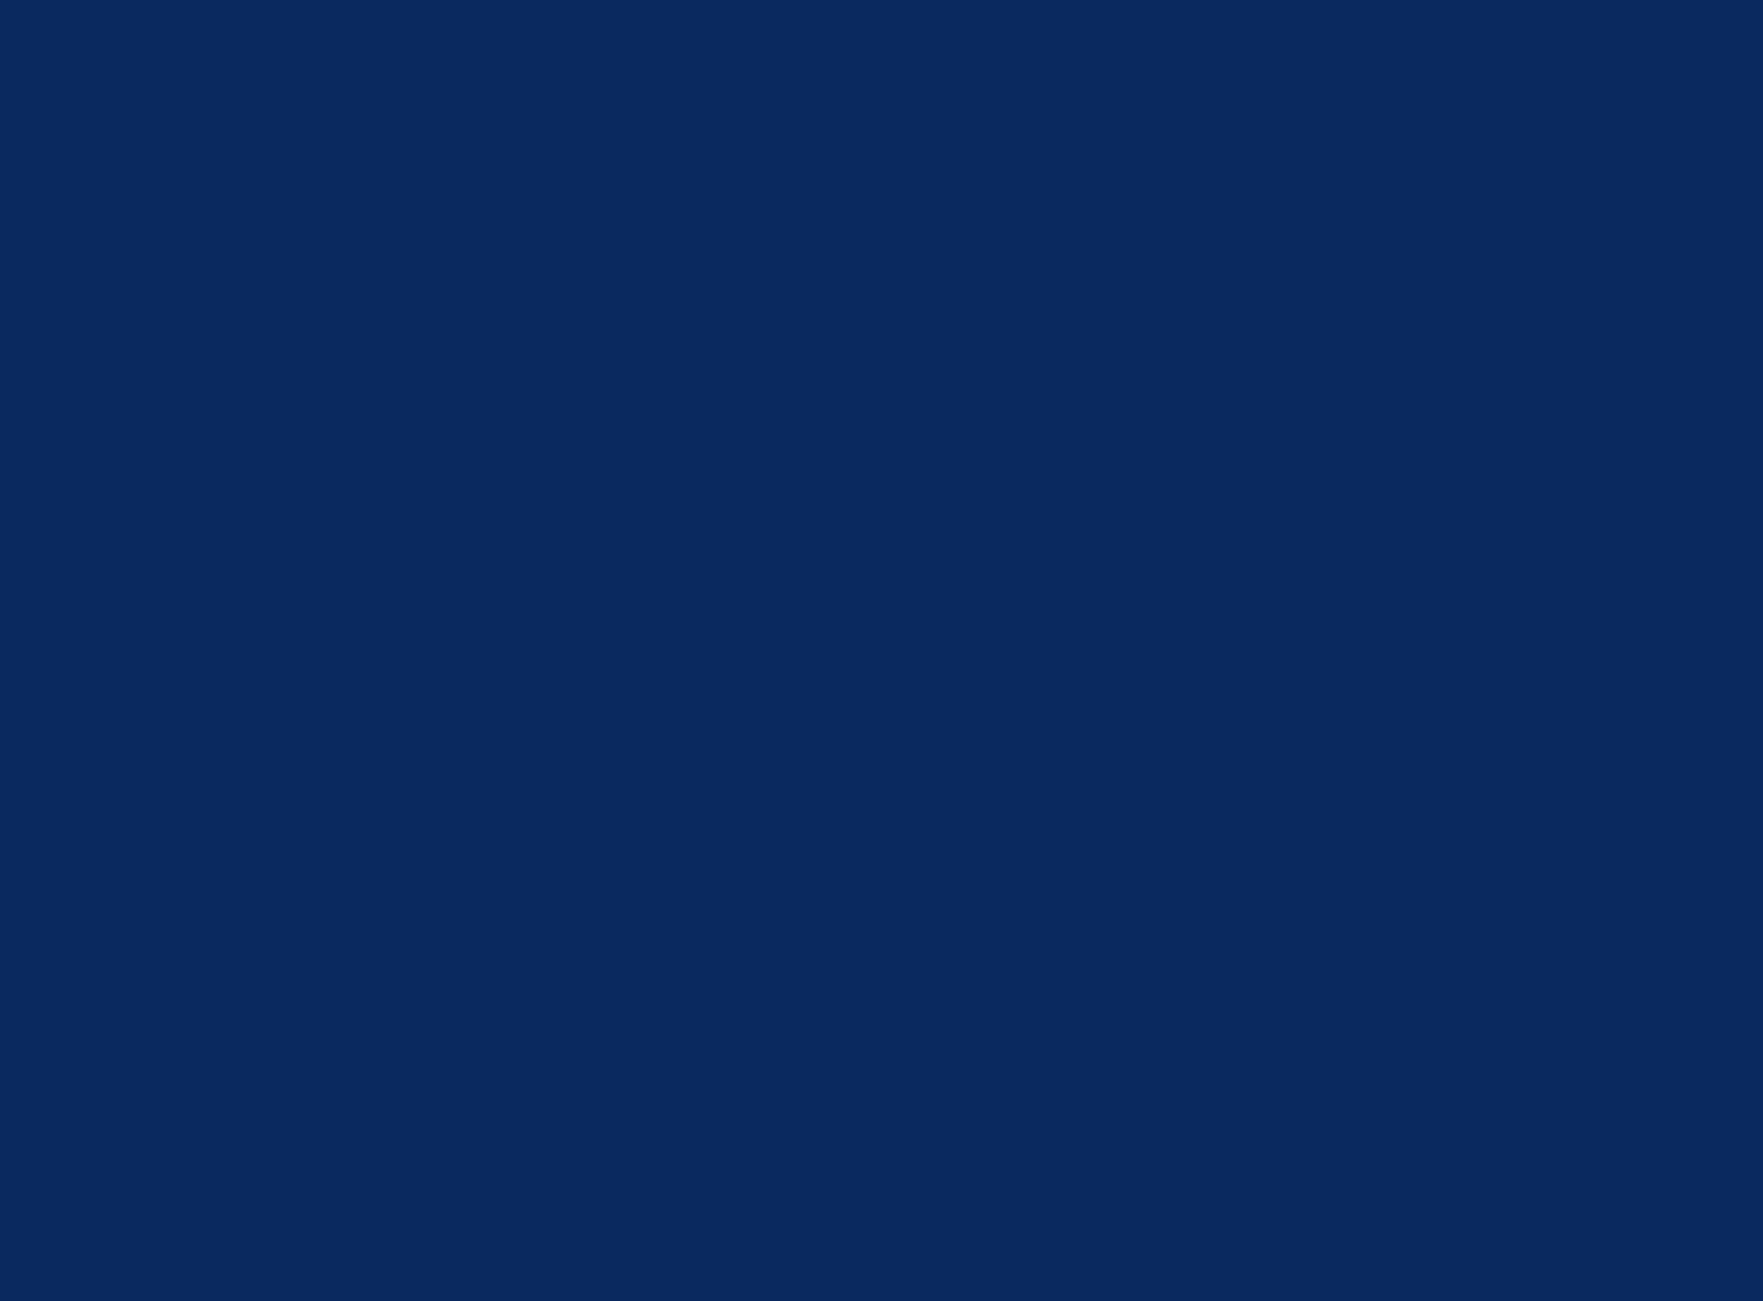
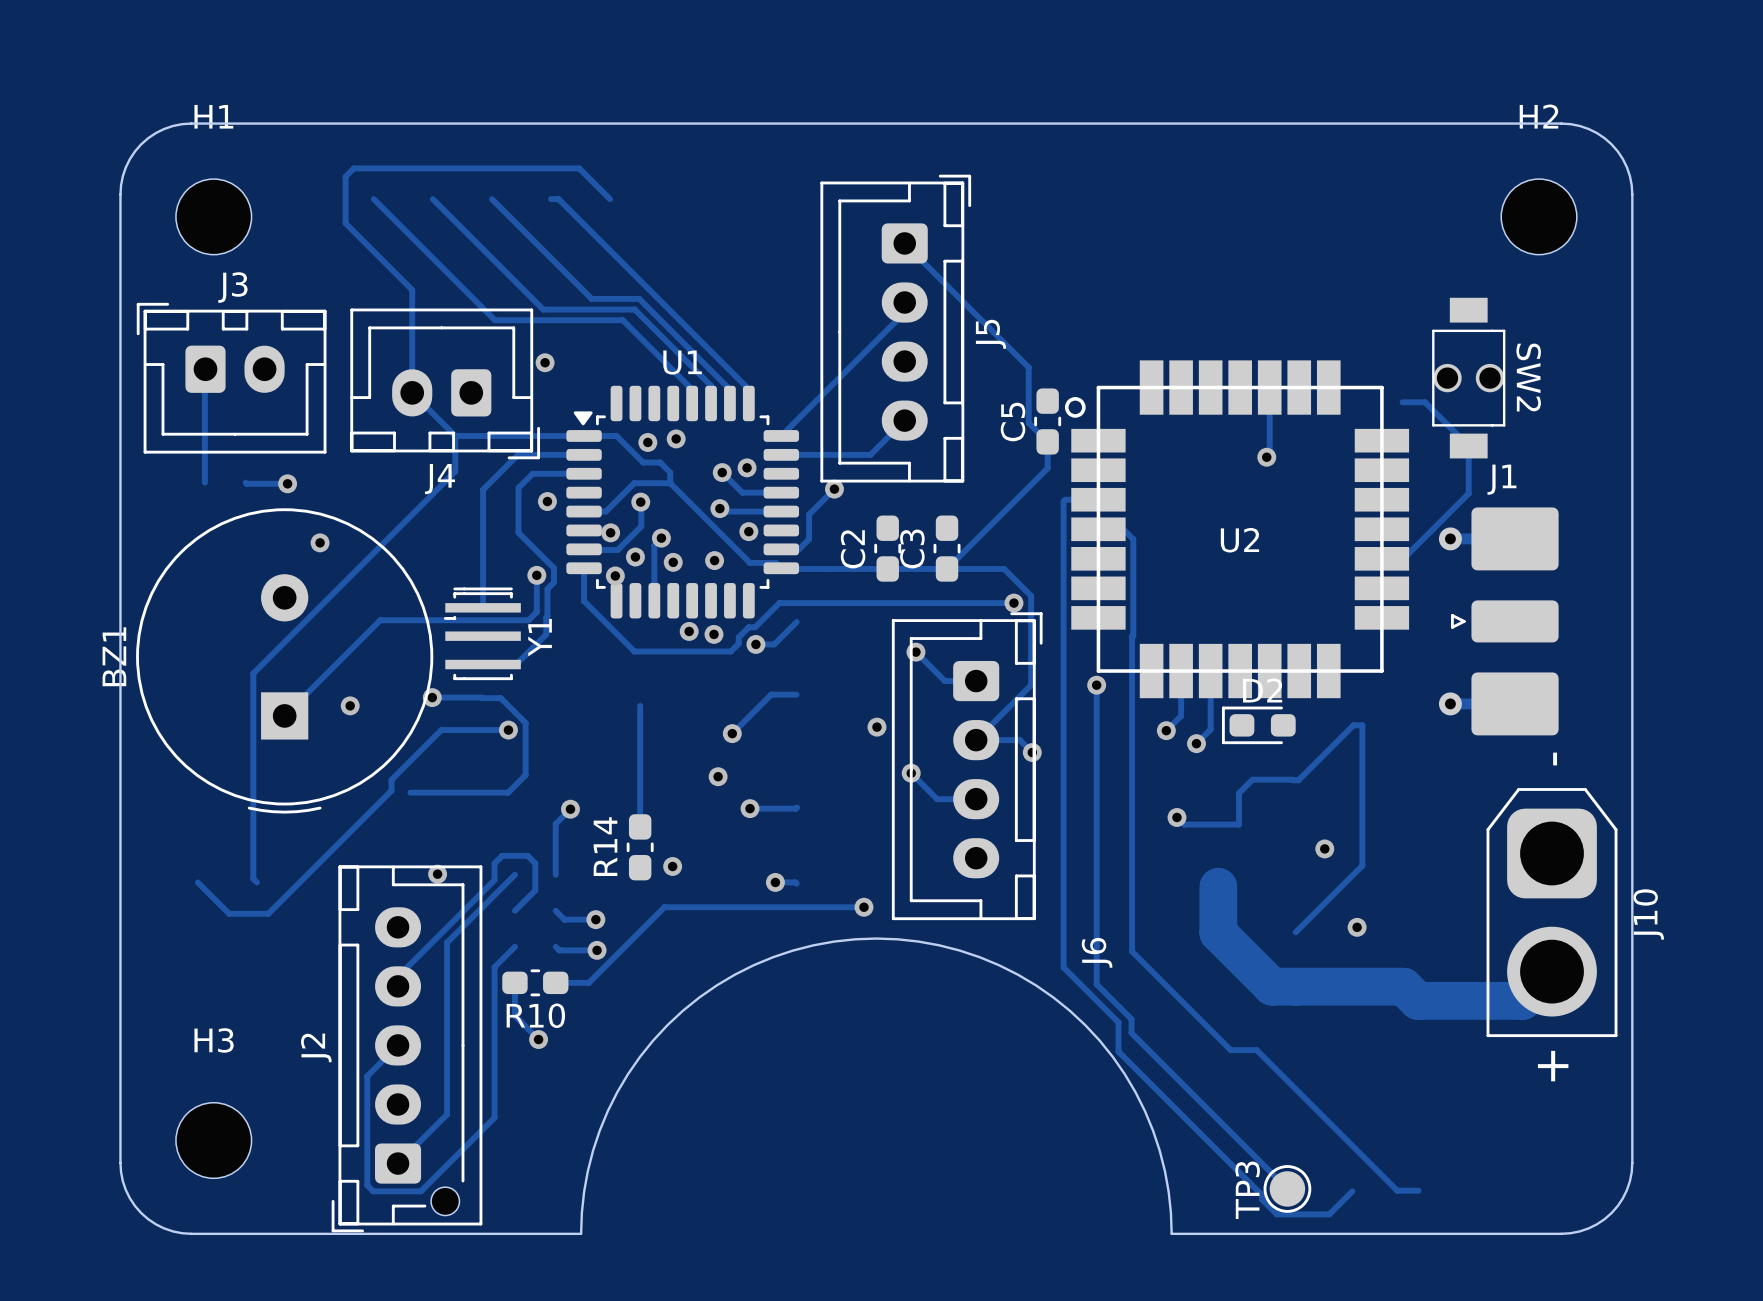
board edge: none -> (191, 123) (1561, 123) (1579, 125) (1604, 138) (1622, 158) (1629, 176) (1632, 194) (1632, 1162) (1626, 1190) (1617, 1206) (1604, 1219) (1588, 1228) (1561, 1233) (1171, 1233) (1168, 1191) (1159, 1150) (1153, 1130) (1135, 1092) (1124, 1074) (1112, 1056) (1085, 1025) (1053, 997) (1017, 974) (999, 965) (959, 950) (939, 945) (918, 941) (876, 938) (834, 941) (813, 945) (793, 950) (753, 965) (734, 974) (699, 997) (667, 1025) (640, 1056) (627, 1074) (617, 1092) (599, 1130) (587, 1171) (581, 1212) (581, 1233) (191, 1233) (172, 1231) (148, 1219) (135, 1206) (125, 1190) (120, 1162) (120, 194) (125, 167) (141, 144) (164, 128) (191, 123)
track: none -> (373, 199) (494, 320) (622, 320) (692, 389) (692, 403)
track: none -> (432, 199) (543, 309) (634, 309) (711, 385) (711, 403)
track: none -> (491, 199) (591, 298) (639, 298) (729, 389) (729, 403)
track: none -> (550, 199) (558, 199) (748, 389) (748, 403)
track: none -> (610, 199) (579, 168) (353, 168) (345, 176) (345, 223) (412, 289) (412, 392) (455, 435)
H1: none -> (213, 216)
H2: none -> (1539, 216)
track: none -> (904, 243) (1028, 367) (1028, 422) (1047, 441) (1047, 468) (947, 568)
track: none -> (904, 302) (904, 312) (781, 435)
J5: none -> (895, 328)
via: none -> (545, 362)
track: none -> (205, 369) (204, 482)
J3: none -> (231, 378)
SW2: none -> (1468, 378)
J4: none -> (445, 383)
track: none -> (1269, 387) (1269, 454) (1266, 457)
track: none -> (1402, 402) (1425, 402) (1468, 446) (1468, 493) (1403, 558) (1381, 558)
track: none -> (904, 420) (870, 454) (781, 454)
C5: none -> (1047, 421)
track: none -> (455, 435) (616, 435) (643, 462) (660, 462) (670, 472) (670, 483)
track: none -> (455, 435) (455, 471) (253, 673) (253, 878) (256, 882)
via: none -> (676, 438)
via: none -> (647, 442)
track: none -> (584, 454) (517, 454) (483, 489) (483, 607)
via: none -> (1266, 457)
via: none -> (747, 467)
track: none -> (722, 472) (742, 492) (781, 492)
via: none -> (722, 472)
track: none -> (584, 473) (532, 473) (518, 487) (518, 532) (553, 568) (553, 582) (547, 588) (546, 634) (516, 664) (483, 664)
track: none -> (245, 482) (287, 483)
via: none -> (287, 483)
track: none -> (670, 483) (634, 483) (605, 511) (584, 511)
track: none -> (670, 483) (749, 562) (776, 562) (782, 568) (1004, 568) (1031, 595) (1031, 685) (976, 740) (1019, 740) (1032, 752)
track: none -> (834, 489) (809, 514) (809, 539) (799, 549) (781, 549)
via: none -> (834, 489)
track: none -> (1098, 499) (1065, 499) (1063, 501) (1063, 967) (1118, 1022) (1118, 1051) (1262, 1195) (1262, 1199) (1276, 1214) (1329, 1214) (1352, 1191)
via: none -> (547, 501)
track: none -> (640, 502) (641, 526) (617, 549) (584, 549)
via: none -> (640, 502)
U1: none -> (682, 502)
track: none -> (719, 508) (722, 511) (781, 511)
via: none -> (719, 508)
track: none -> (1098, 529) (1123, 529) (1133, 539) (1132, 951) (1230, 1050) (1256, 1050) (1397, 1190) (1418, 1190)
U2: none -> (1237, 529)
via: none -> (748, 531)
via: none -> (610, 532)
track: none -> (661, 538) (654, 545) (654, 600)
via: none -> (661, 538)
via: none -> (320, 542)
C2: none -> (887, 548)
C3: none -> (947, 548)
via: none -> (635, 557)
via: none -> (714, 560)
via: none -> (673, 562)
track: none -> (584, 568) (584, 601) (634, 651) (730, 651) (738, 643) (738, 637) (748, 627) (755, 627) (779, 603) (1013, 603)
track: none -> (536, 575) (536, 612) (528, 620) (380, 620) (284, 715)
via: none -> (536, 575)
via: none -> (615, 575)
via: none -> (1013, 603)
J1: none -> (1498, 621)
track: none -> (796, 622) (774, 644) (755, 644)
via: none -> (689, 631)
Y1: none -> (482, 633)
via: none -> (713, 634)
via: none -> (755, 644)
track: none -> (915, 652) (944, 681) (976, 681)
via: none -> (915, 652)
BZ1: none -> (284, 660)
track: none -> (1181, 671) (1181, 715) (1166, 730)
track: none -> (1210, 671) (1210, 729) (1196, 743)
track: none -> (1096, 685) (1096, 984) (1131, 1019) (1131, 1033) (1287, 1188)
via: none -> (1096, 685)
track: none -> (796, 694) (771, 694) (732, 733)
track: none -> (432, 697) (500, 698) (525, 722) (525, 775) (508, 792) (410, 792)
via: none -> (432, 697)
via: none -> (350, 705)
track: none -> (640, 705) (640, 826)
part: none -> (1258, 725)
via: none -> (876, 727)
track: none -> (508, 730) (441, 730) (391, 779) (391, 790) (268, 913) (229, 913) (197, 882)
via: none -> (508, 730)
via: none -> (1166, 730)
via: none -> (732, 733)
via: none -> (1196, 743)
via: none -> (1032, 752)
J6: none -> (967, 766)
track: none -> (911, 773) (937, 799) (976, 799)
via: none -> (911, 773)
via: none -> (718, 776)
track: none -> (797, 807) (750, 808)
via: none -> (750, 808)
track: none -> (570, 809) (555, 824) (555, 874)
via: none -> (570, 809)
track: none -> (1176, 817) (1184, 824) (1239, 824) (1239, 793) (1252, 779) (1298, 780) (1353, 725) (1362, 725) (1362, 865) (1295, 932)
via: none -> (1176, 817)
R14: none -> (640, 847)
via: none -> (1324, 848)
via: none -> (672, 866)
via: none -> (437, 874)
track: none -> (514, 874) (447, 942) (447, 1114) (398, 1163)
track: none -> (775, 882) (796, 883)
via: none -> (775, 882)
track: none -> (1218, 886) (1218, 932) (1272, 986) (1403, 986) (1417, 1000) (1522, 1000) (1552, 971)
track: none -> (863, 907) (664, 907) (588, 982) (555, 982)
via: none -> (863, 907)
track: none -> (514, 910) (535, 890) (535, 863) (527, 855) (502, 855) (494, 863) (494, 880) (398, 976) (398, 986)
track: none -> (555, 910) (564, 919) (595, 919)
J10: none -> (1552, 912)
via: none -> (595, 919)
via: none -> (1357, 927)
track: none -> (514, 946) (494, 967) (494, 1117) (420, 1191) (373, 1191) (367, 1185) (367, 1076) (398, 1045)
track: none -> (555, 946) (559, 950) (597, 950)
via: none -> (597, 950)
track: none -> (514, 982) (514, 1015) (538, 1039)
R10: none -> (535, 982)
via: none -> (538, 1039)
J2: none -> (407, 1048)
H3: none -> (213, 1140)
TP3: none -> (1287, 1188)

